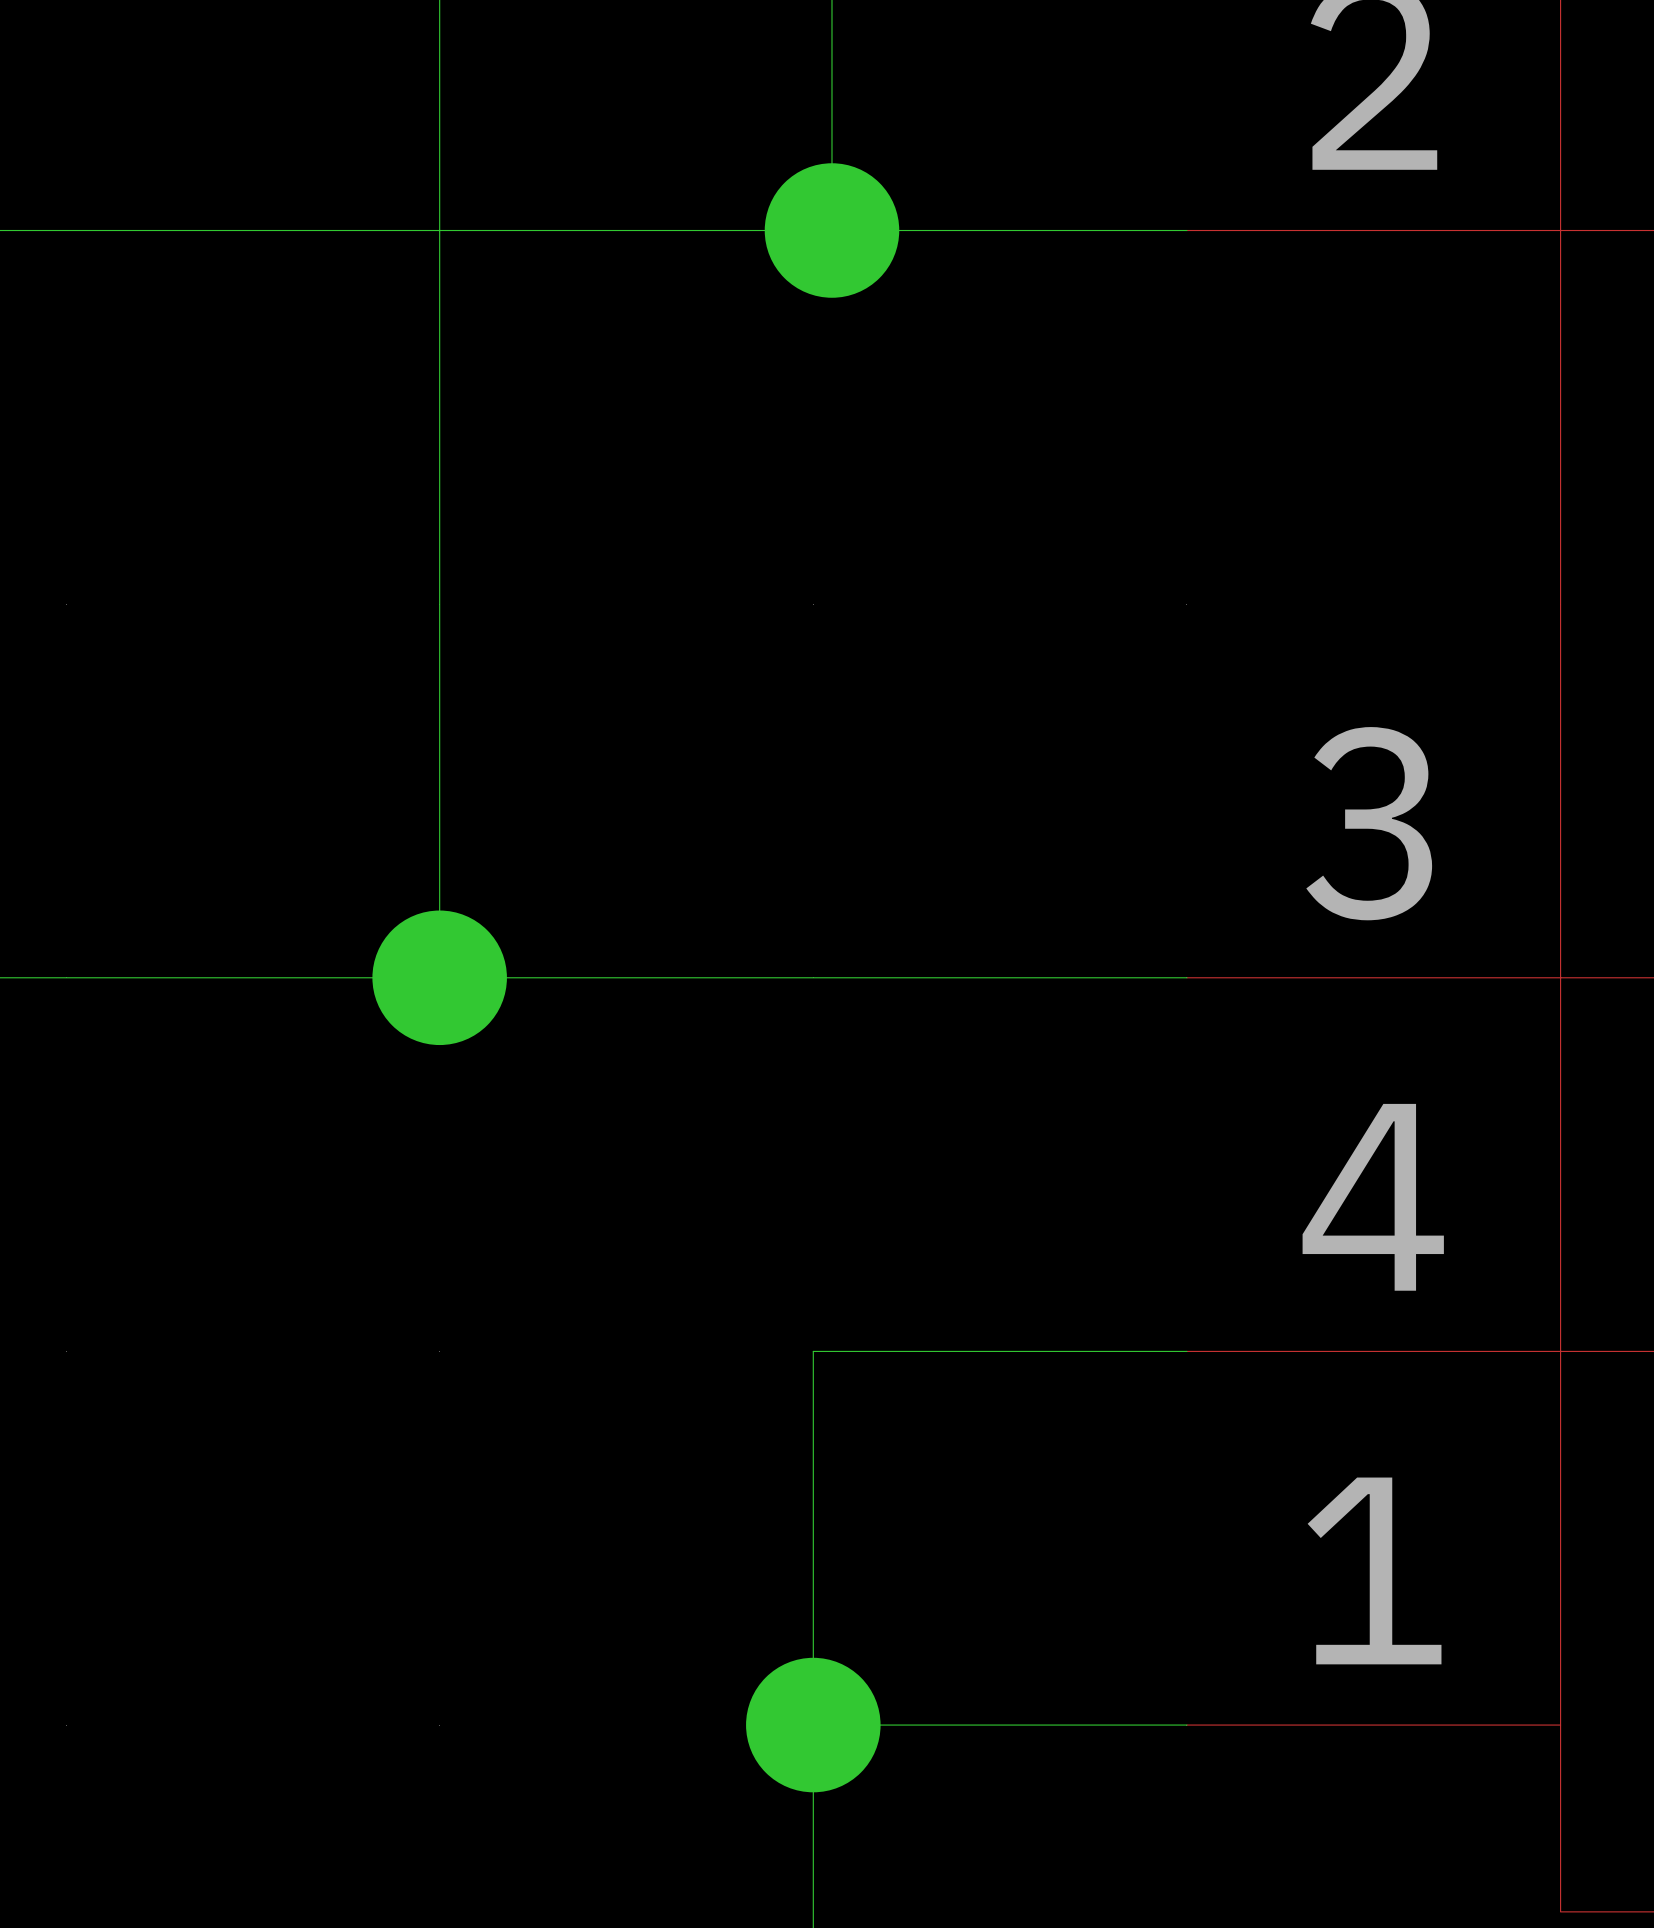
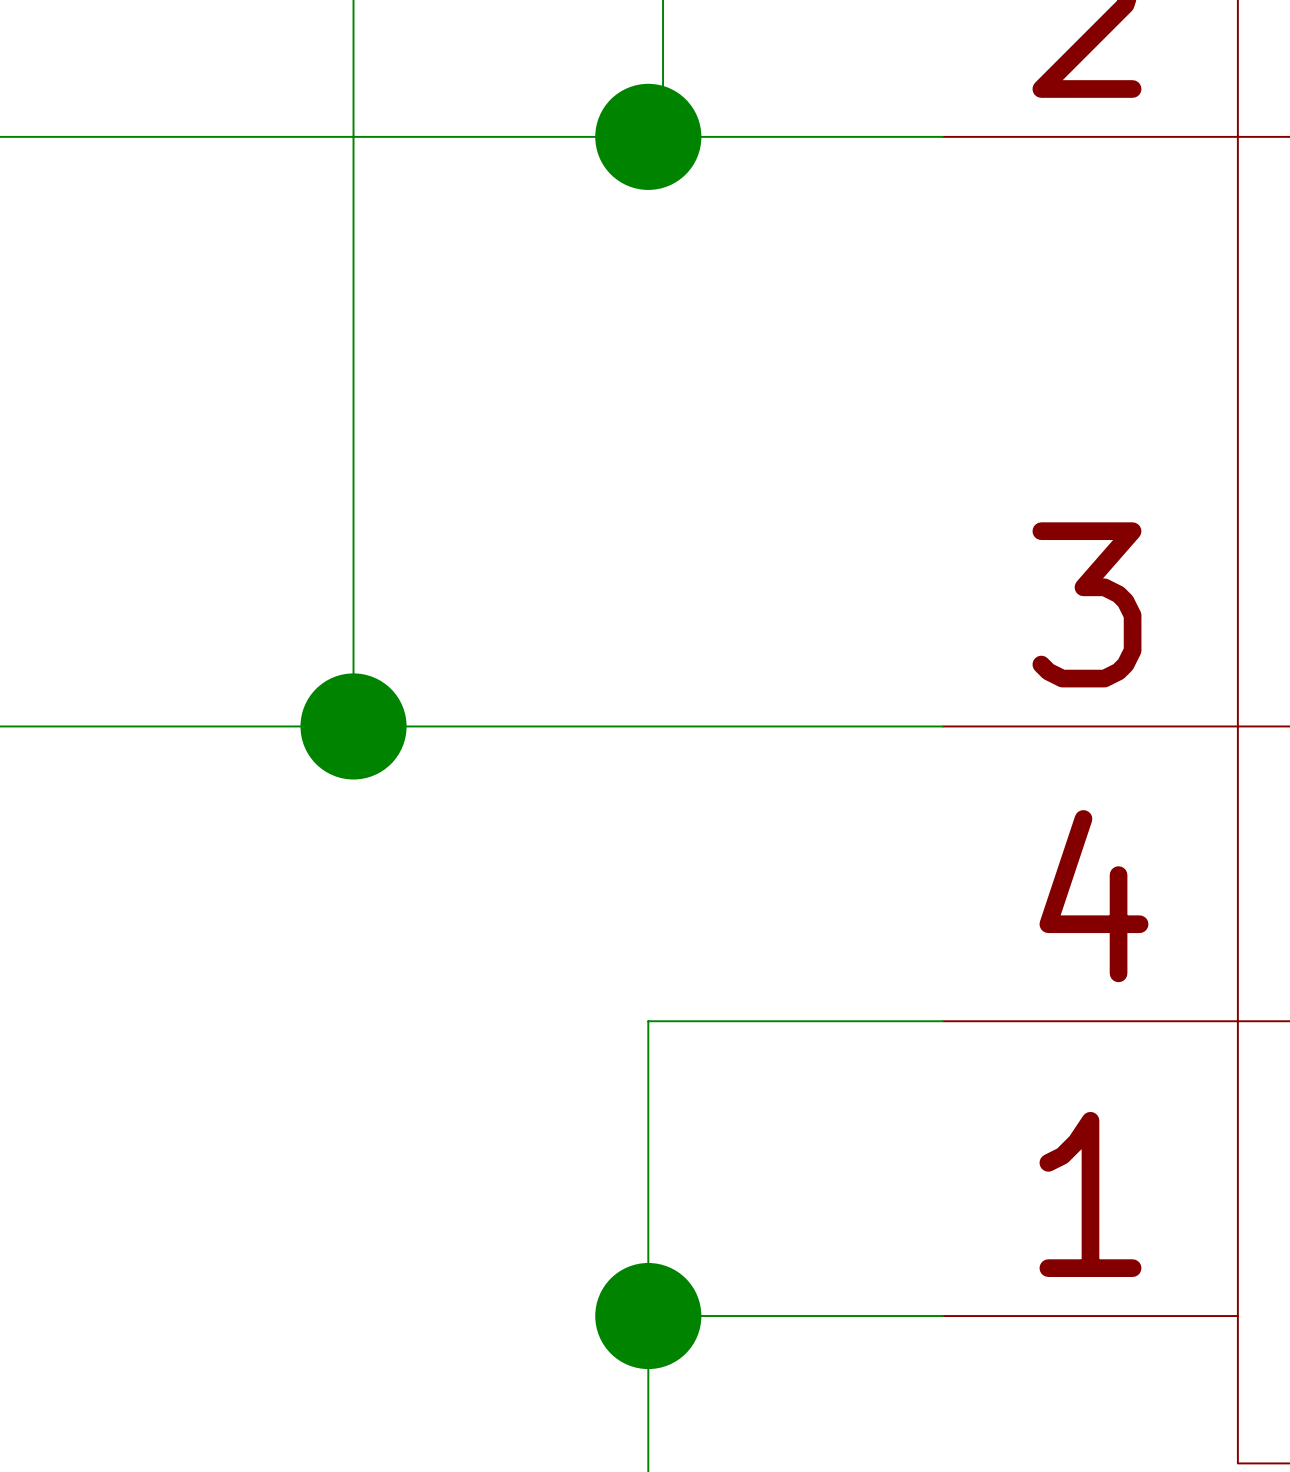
junction position: (831, 230) -> (648, 136)

